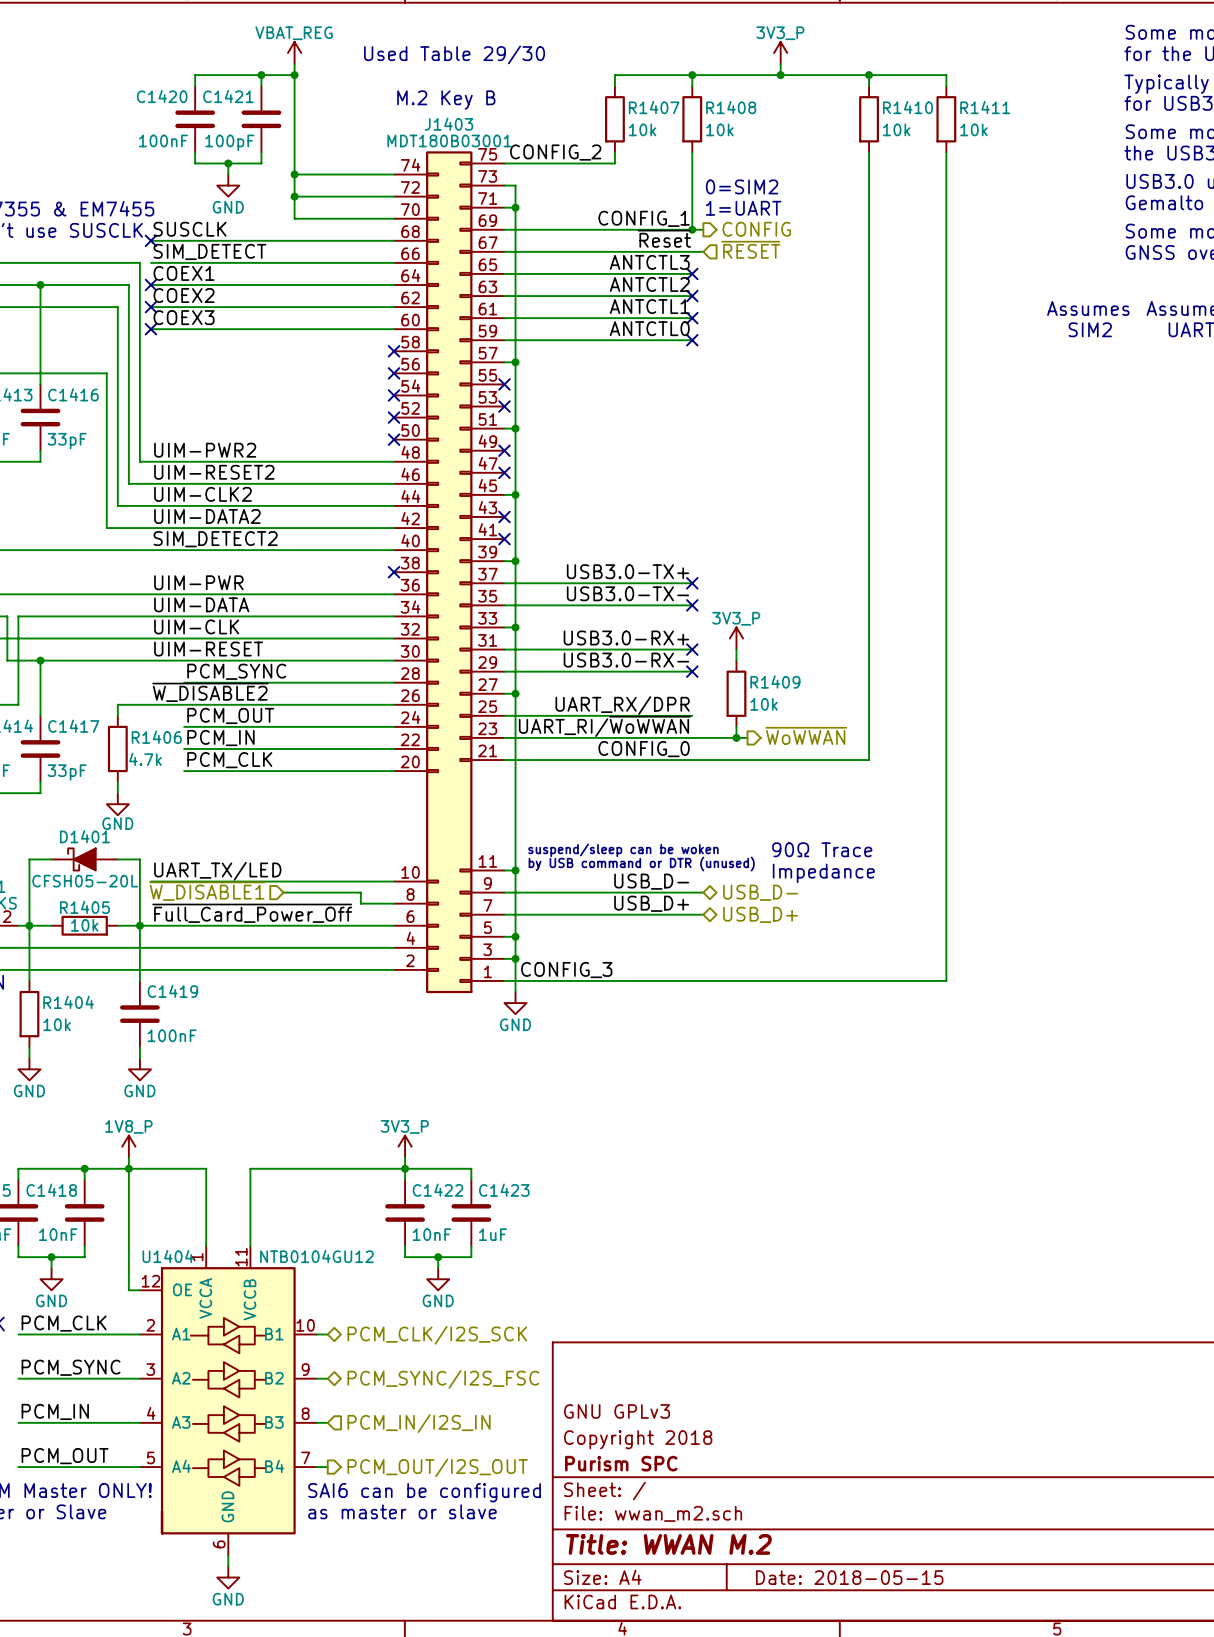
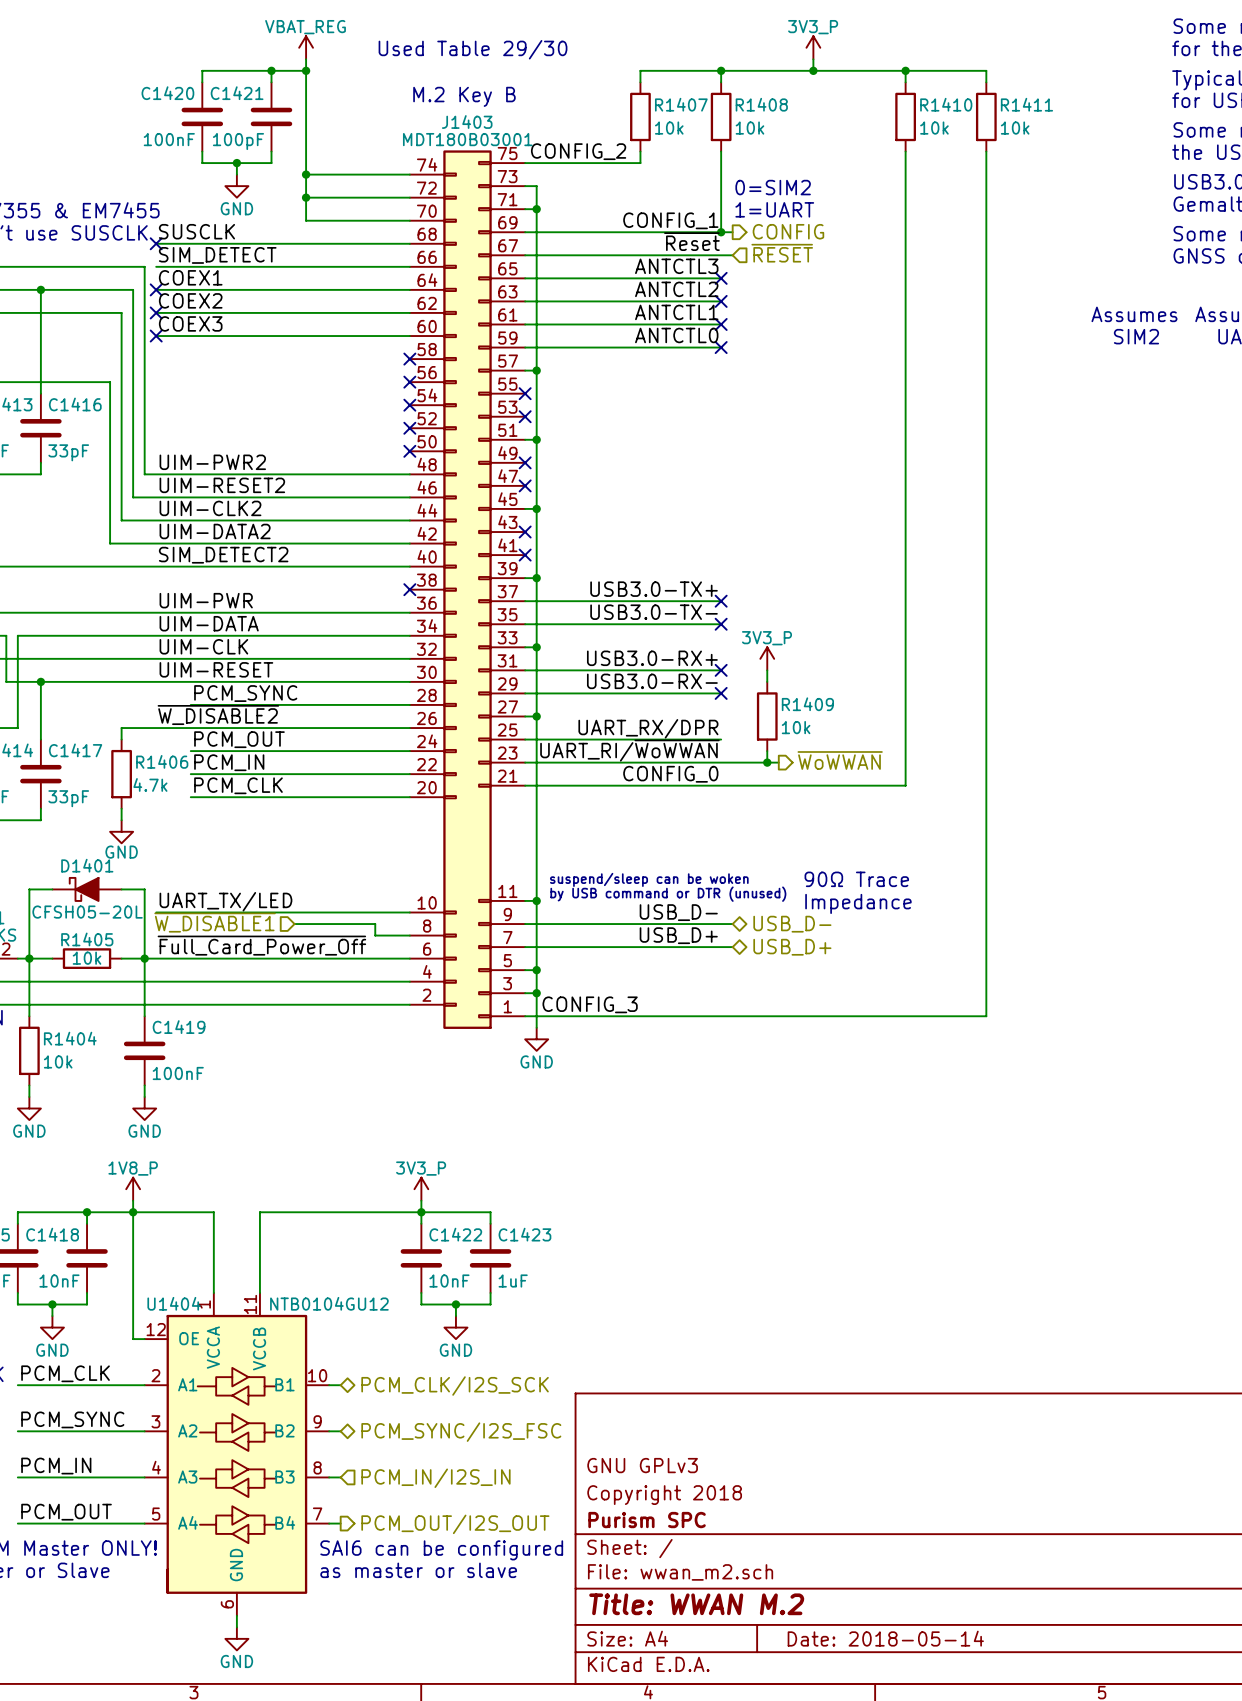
title block: Date: 2018-05-15 (849, 1577) -> Date: 2018-05-14 (885, 1638)

